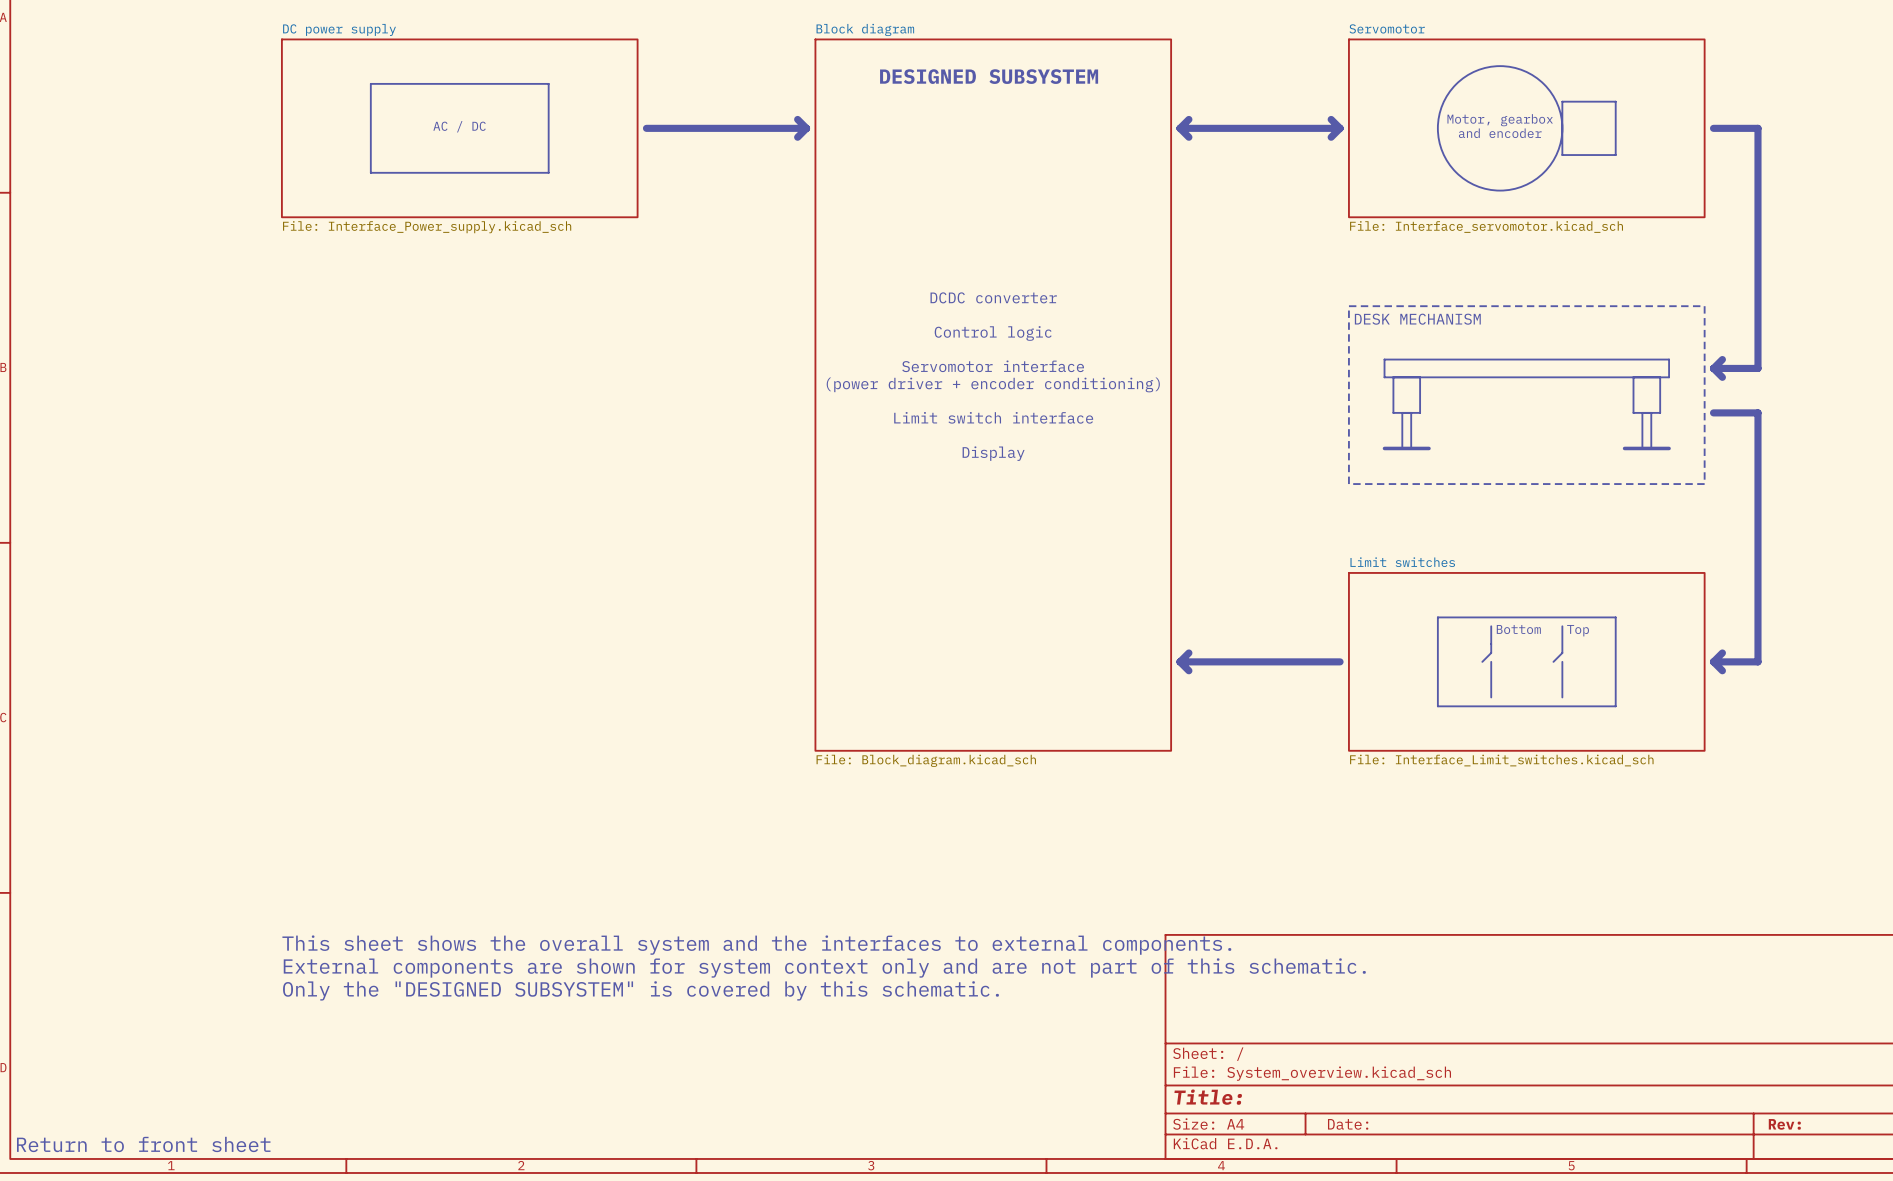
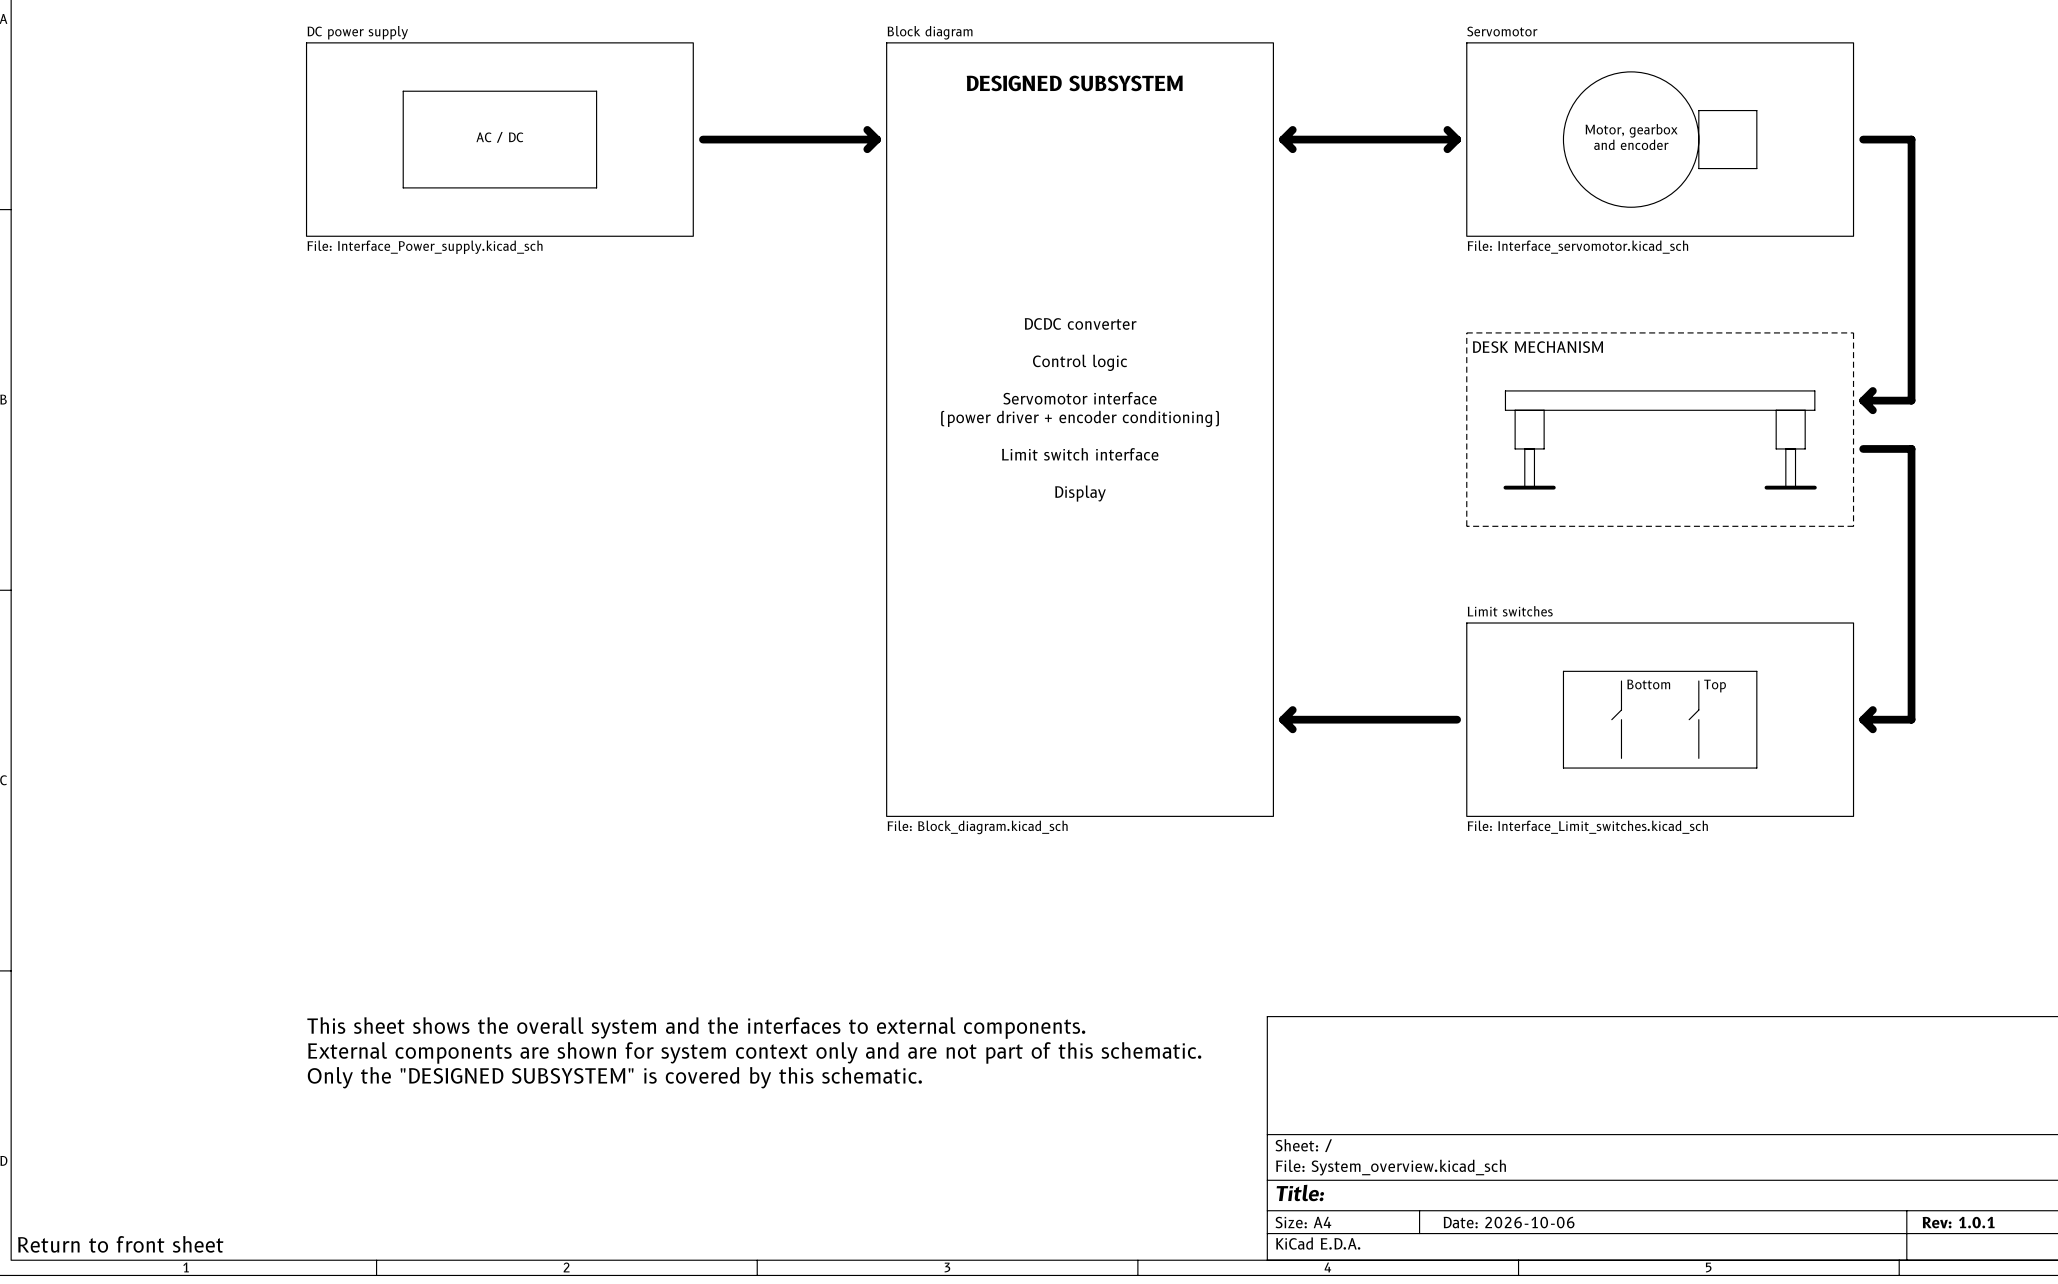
title block: Date: (1348, 1124) -> Date: 2026-10-06 (1509, 1222)
title block: Rev: (1784, 1124) -> Rev: 1.0.1 (1958, 1222)

